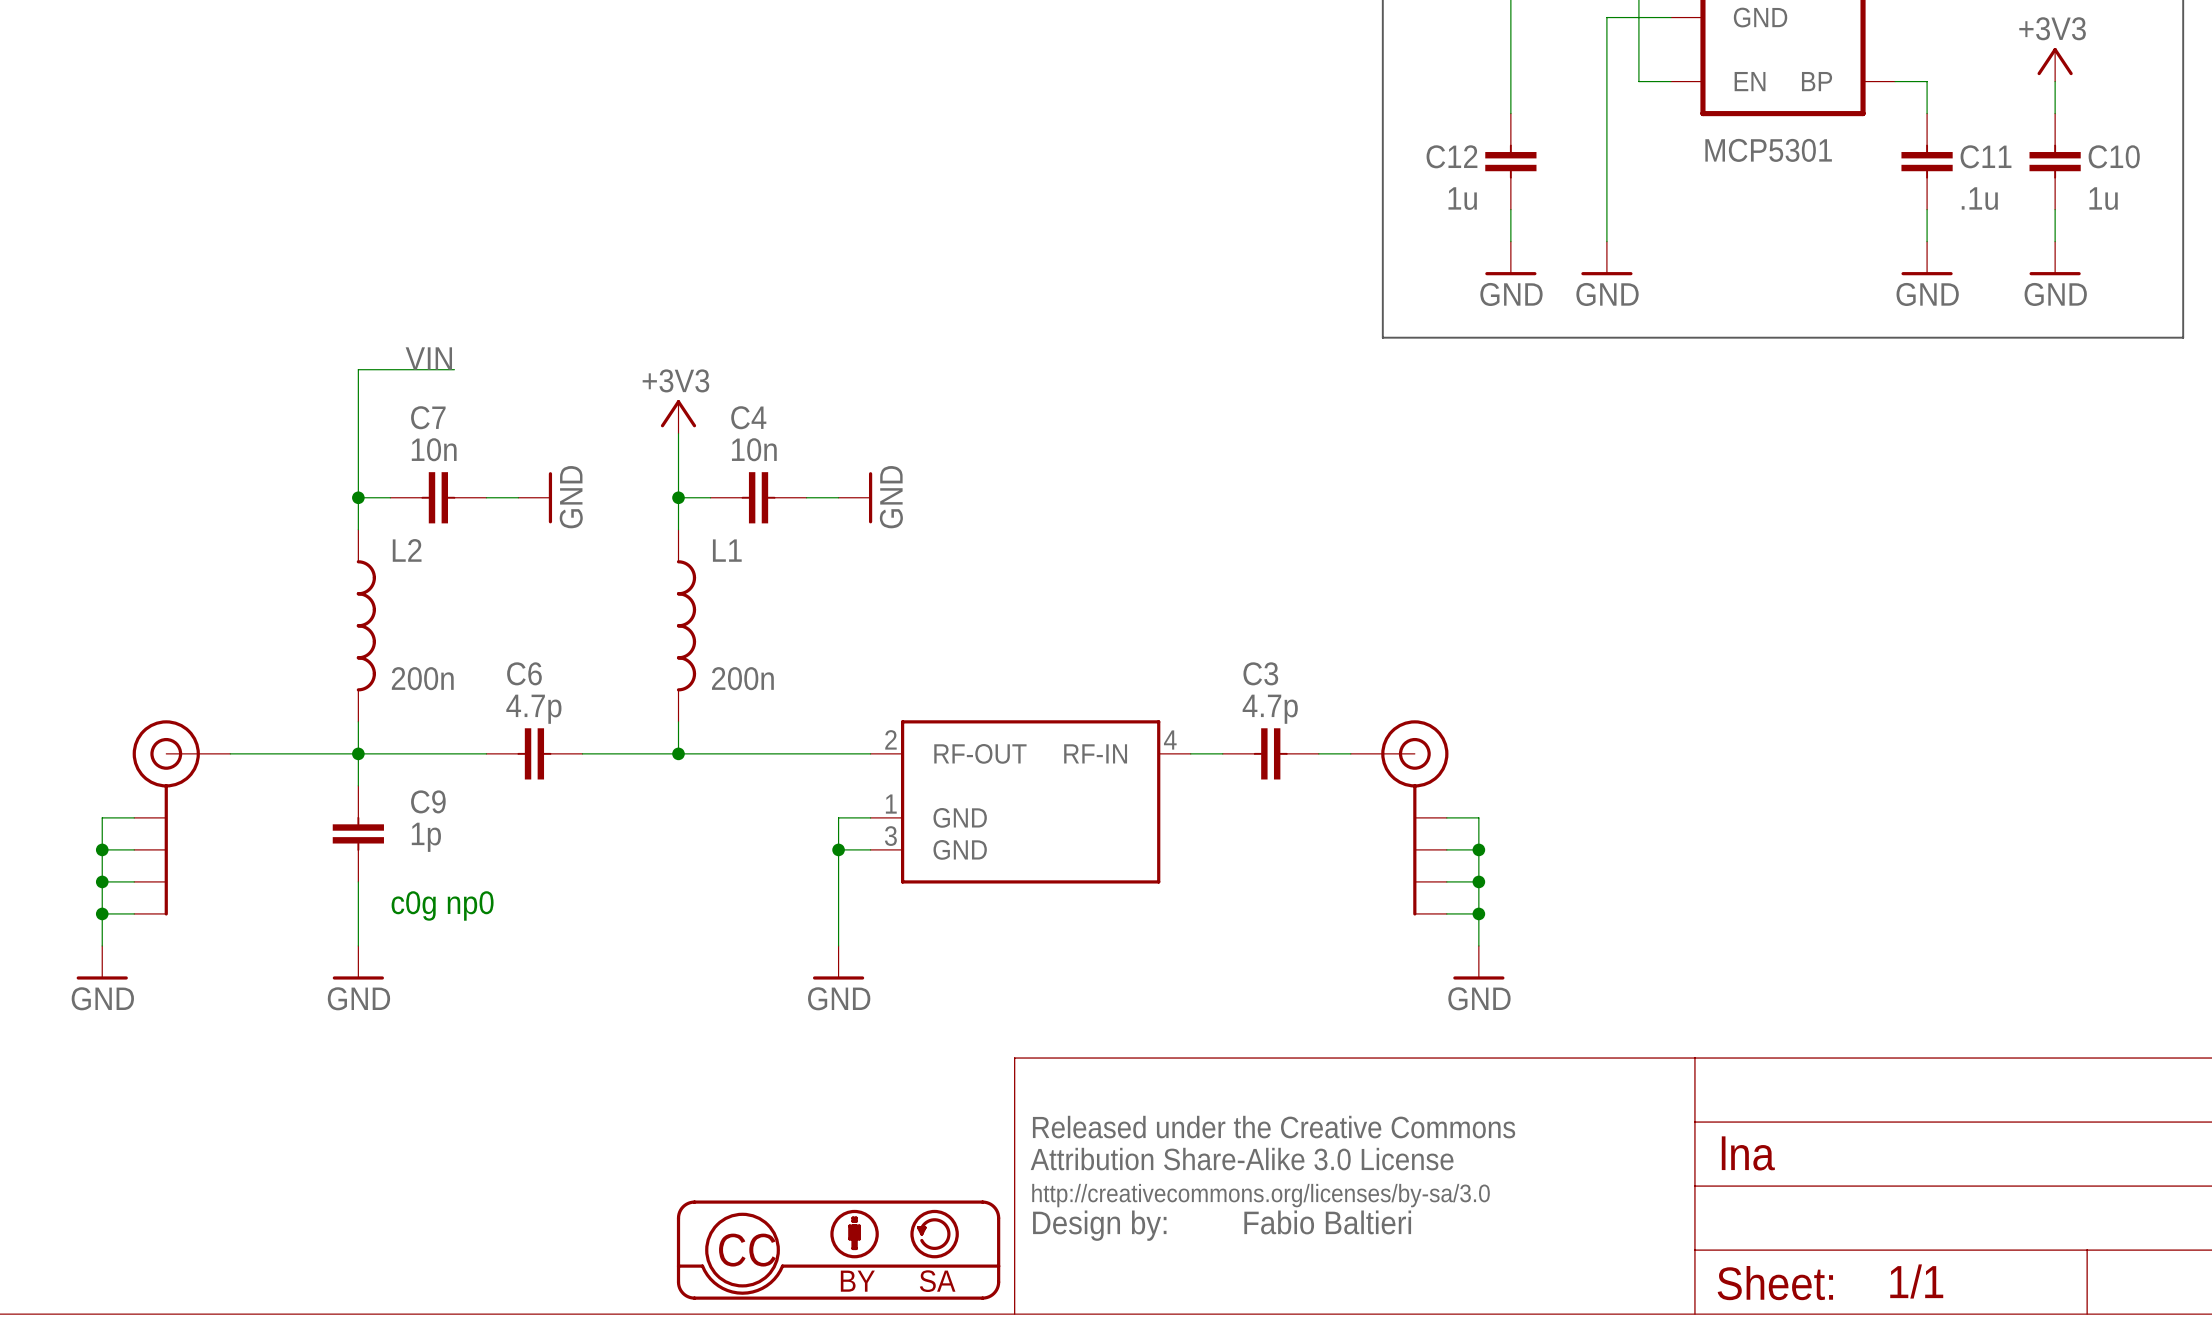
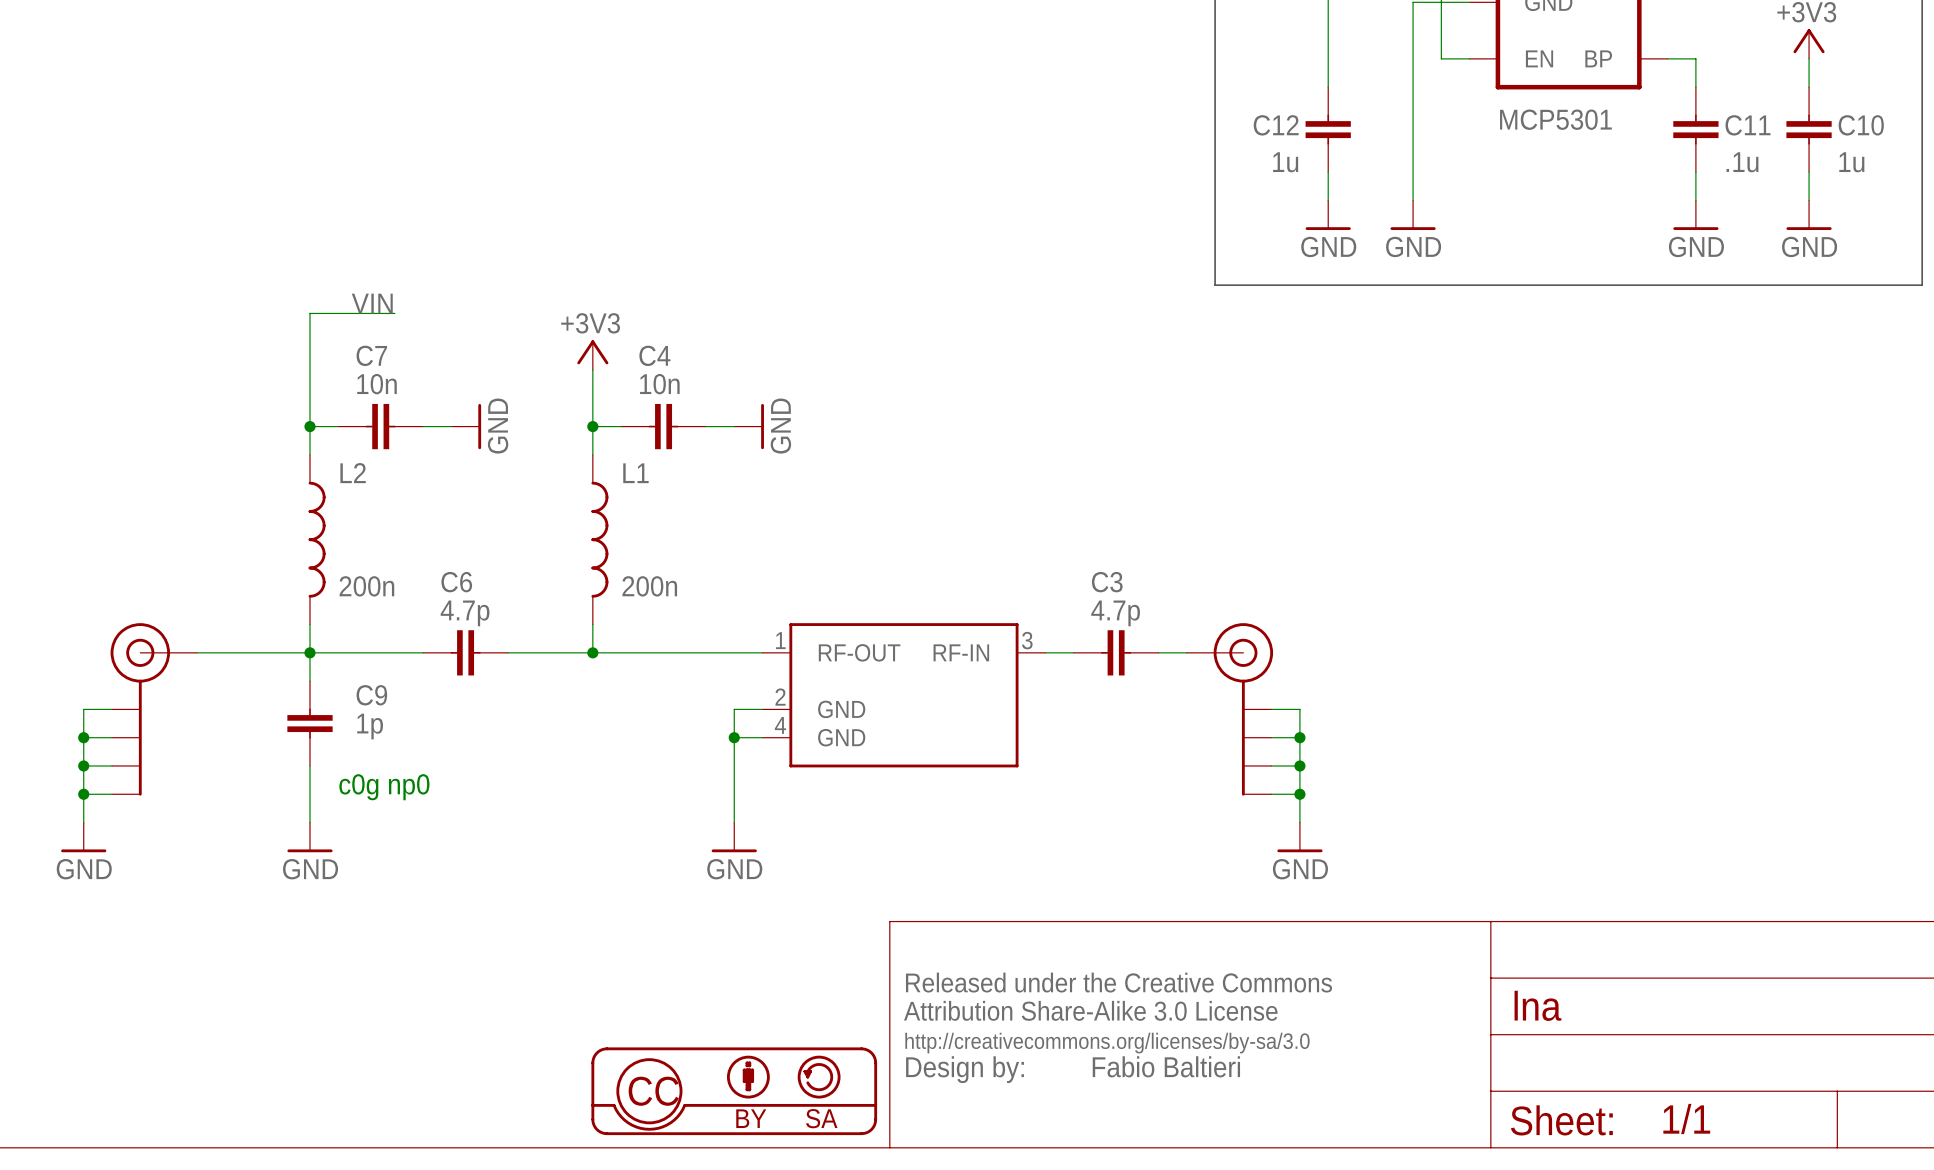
part pin number: 2 (890, 739) -> 1 (780, 640)
part pin number: 4 (1170, 740) -> 3 (1027, 640)
part pin number: 1 (891, 804) -> 2 (780, 697)
part pin number: 3 (890, 836) -> 4 (780, 725)

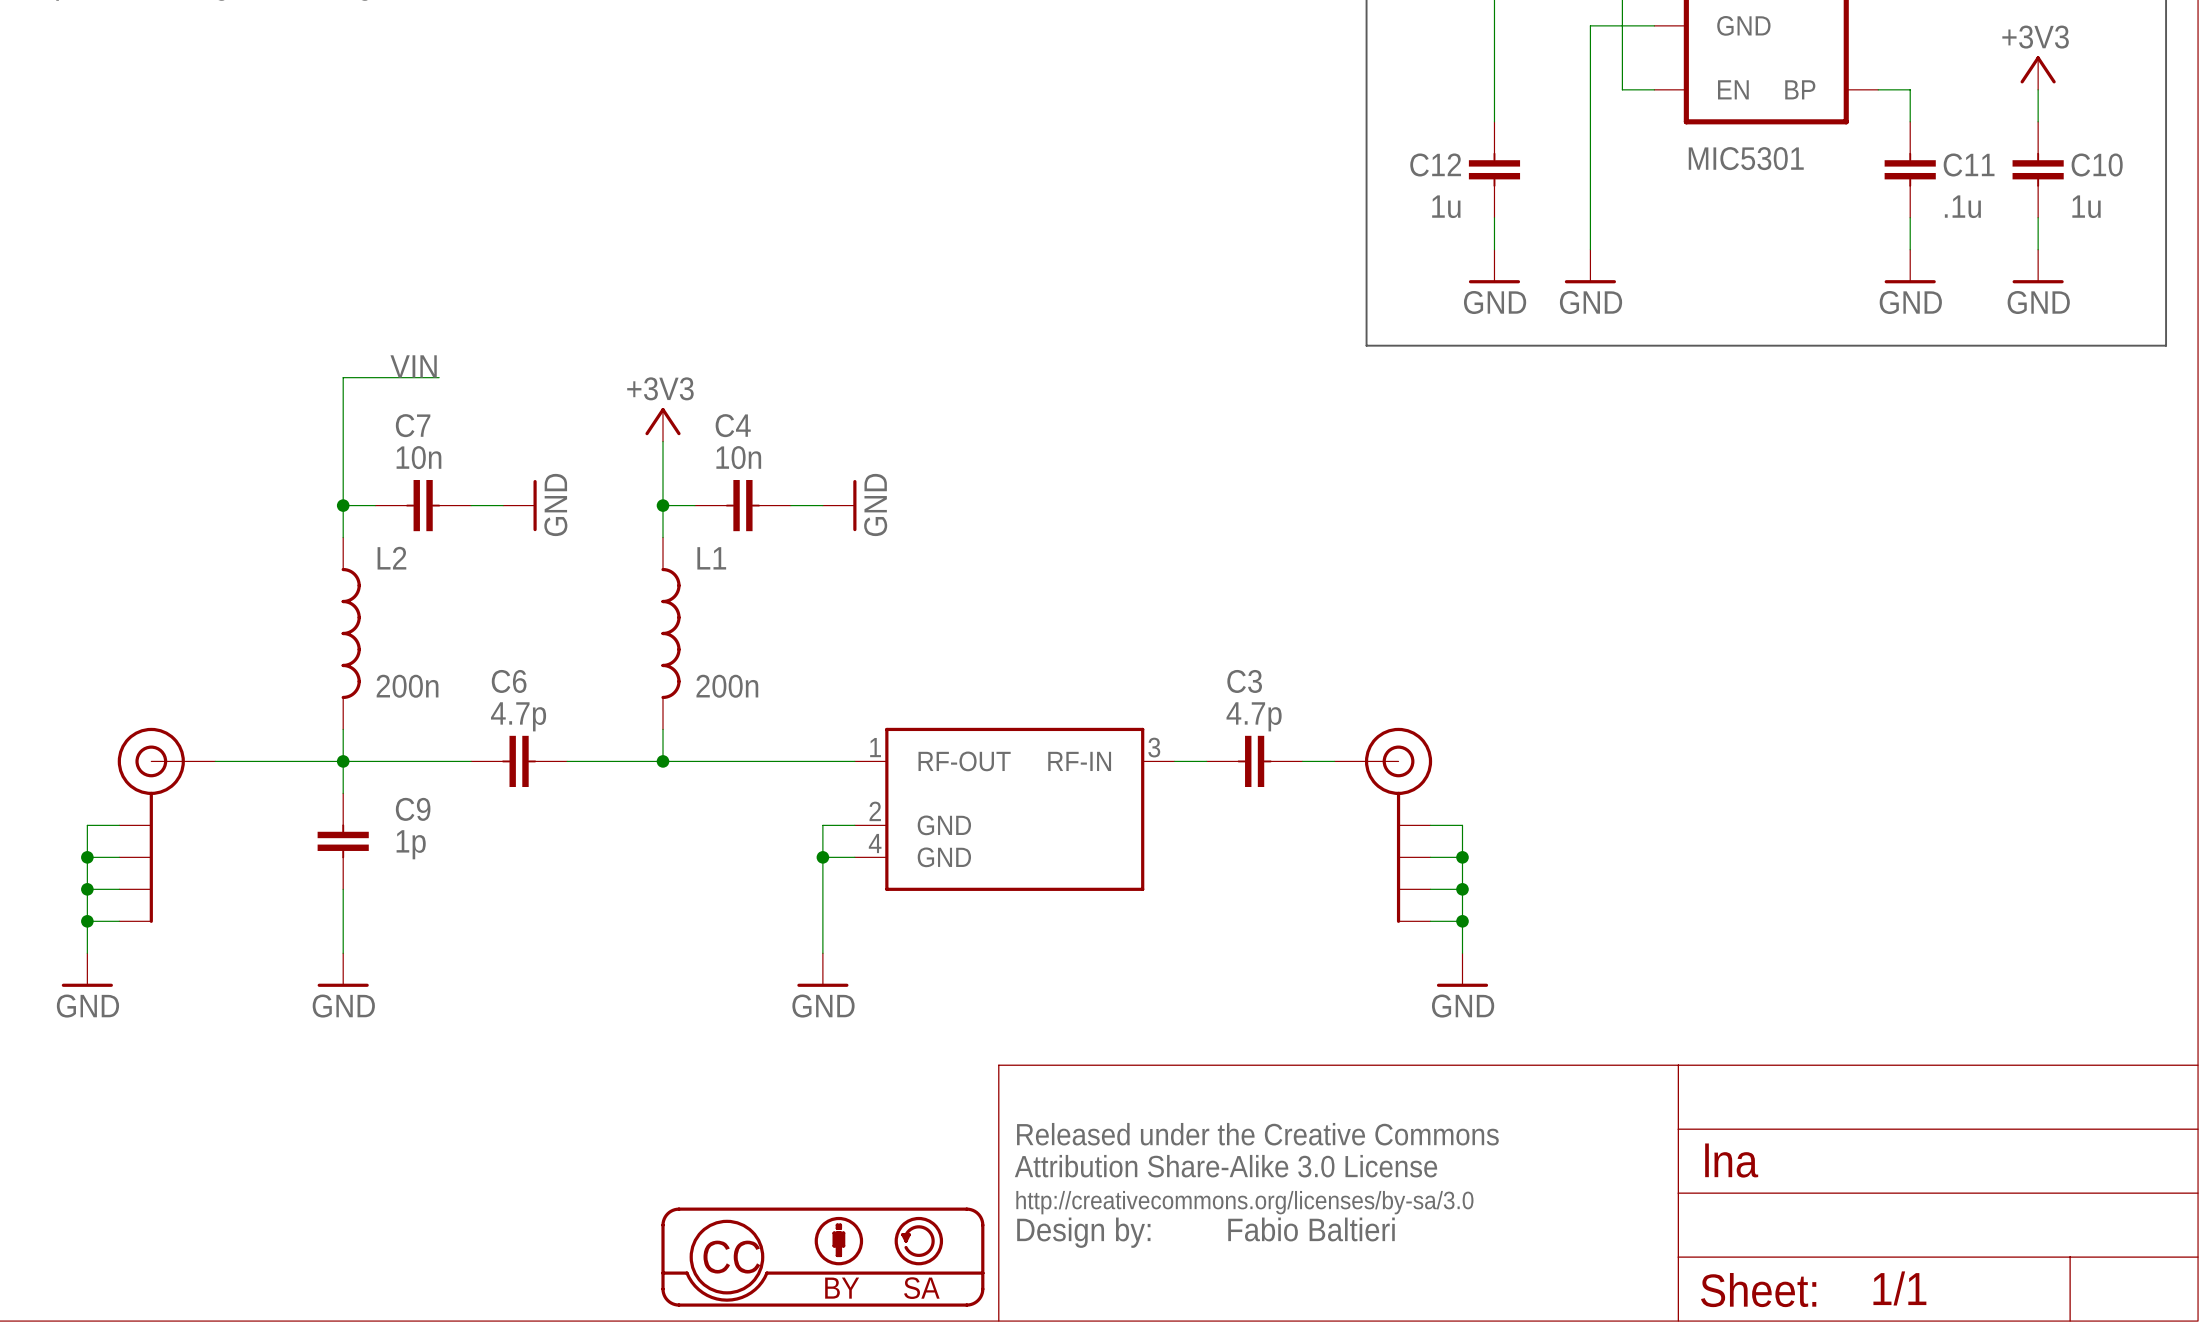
part value: MCP5301 (1555, 119) -> MIC5301 (1746, 158)
text: c0g np0 (384, 787) -> none

